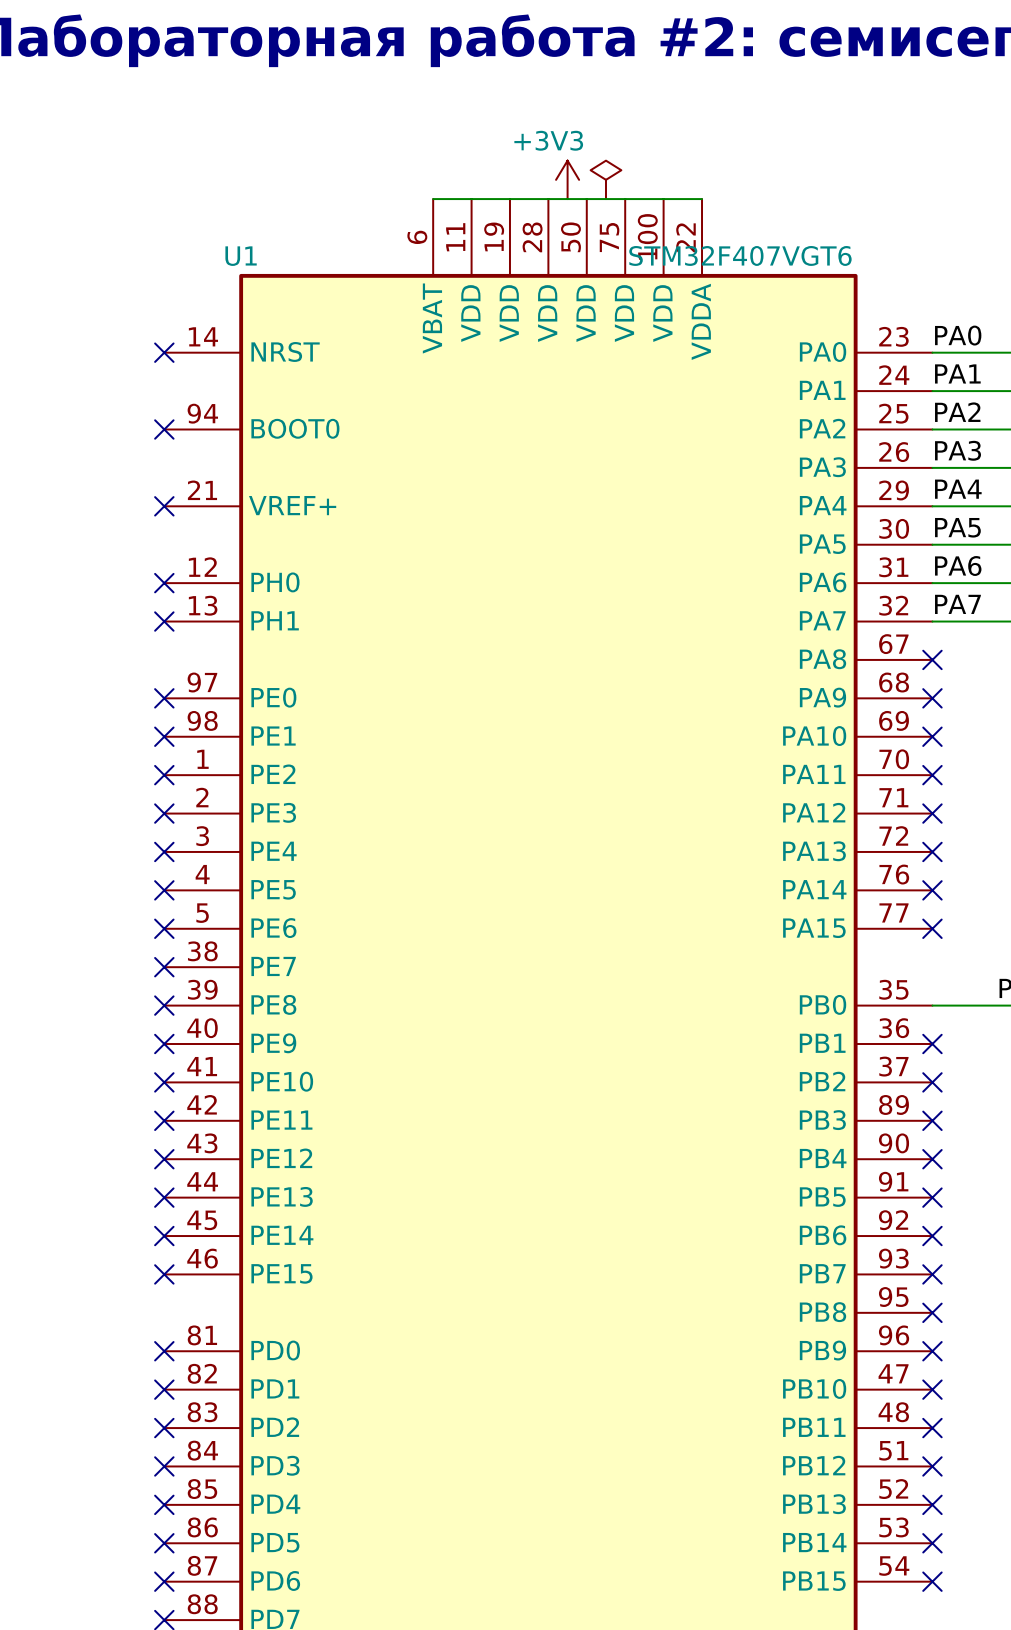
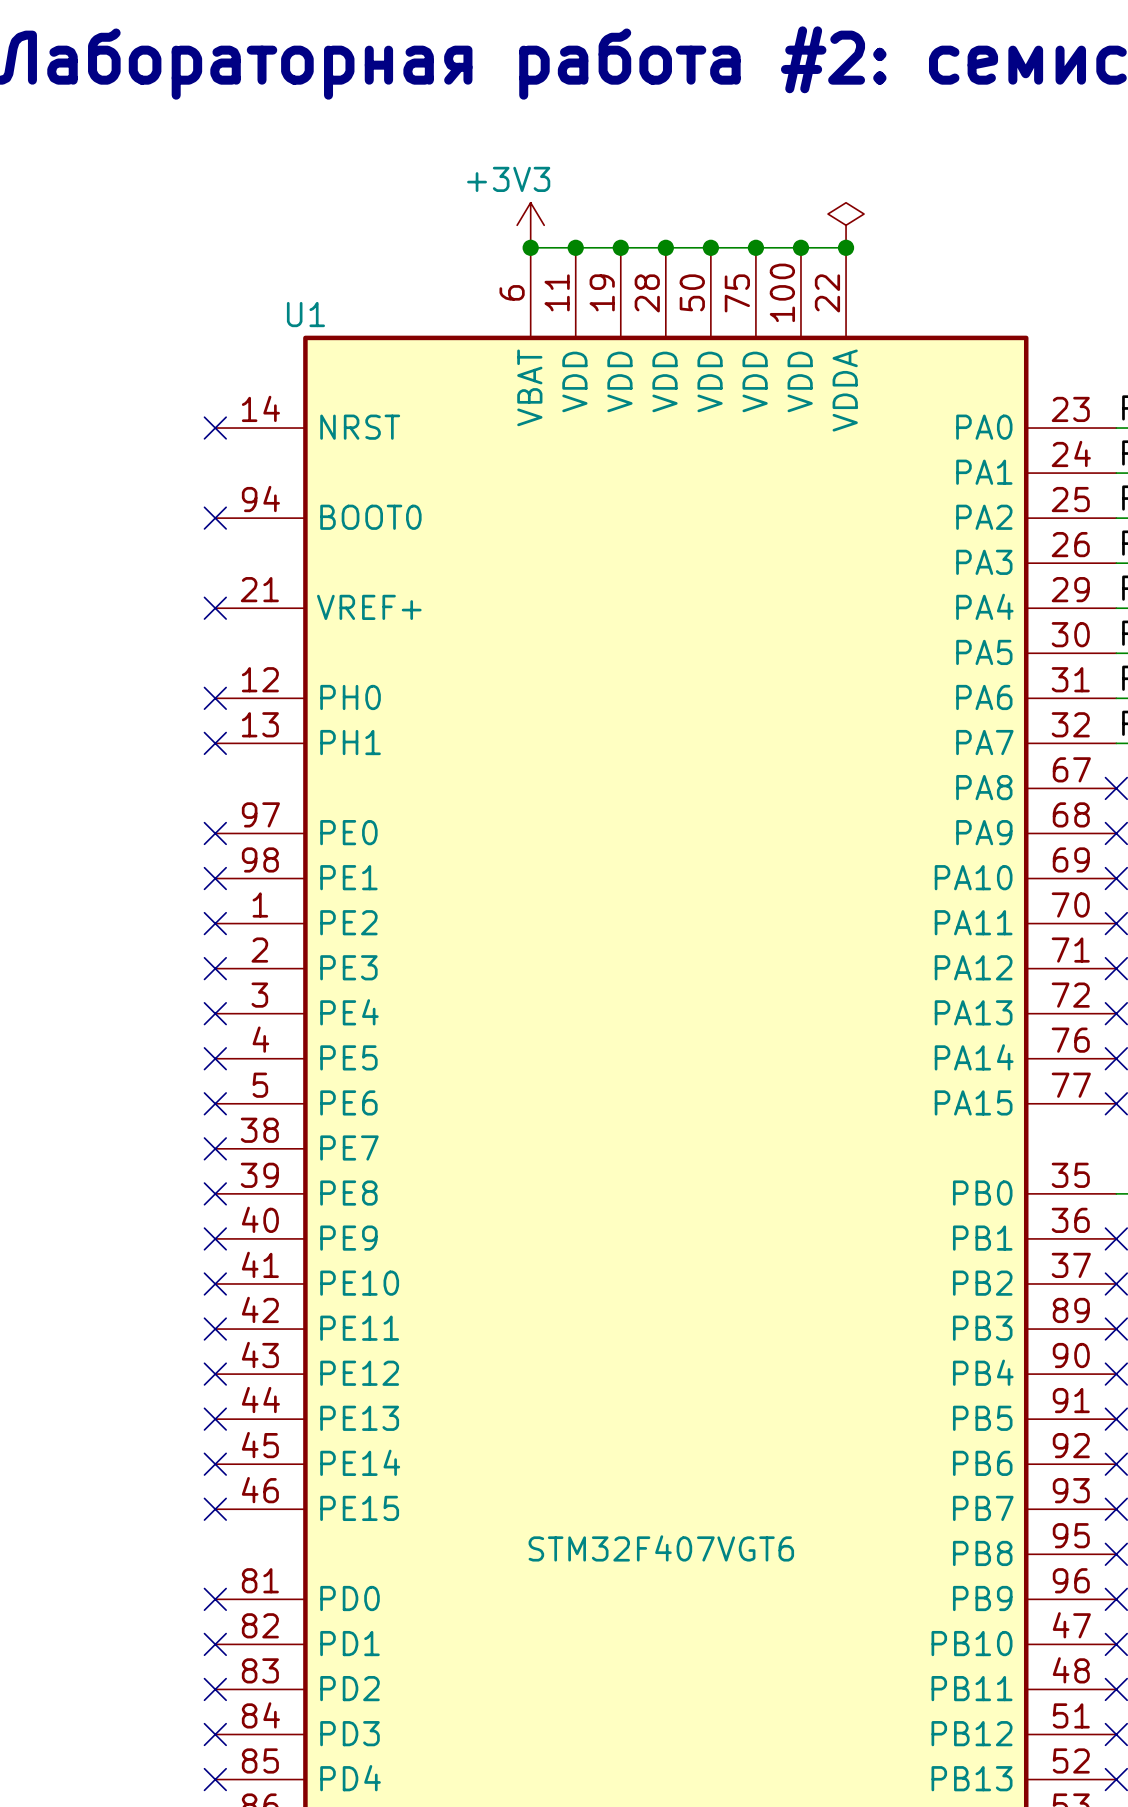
power symbol position: +3V3 (567, 179) -> +3V3 (530, 225)
power symbol position: (605, 179) -> (846, 225)
junction: none -> (530, 247)
junction: none -> (575, 247)
junction: none -> (620, 247)
junction: none -> (665, 247)
junction: none -> (710, 247)
junction: none -> (755, 247)
junction: none -> (800, 247)
junction: none -> (846, 247)
U1 value position: STM32F407VGT6 (740, 255) -> STM32F407VGT6 (661, 1548)

